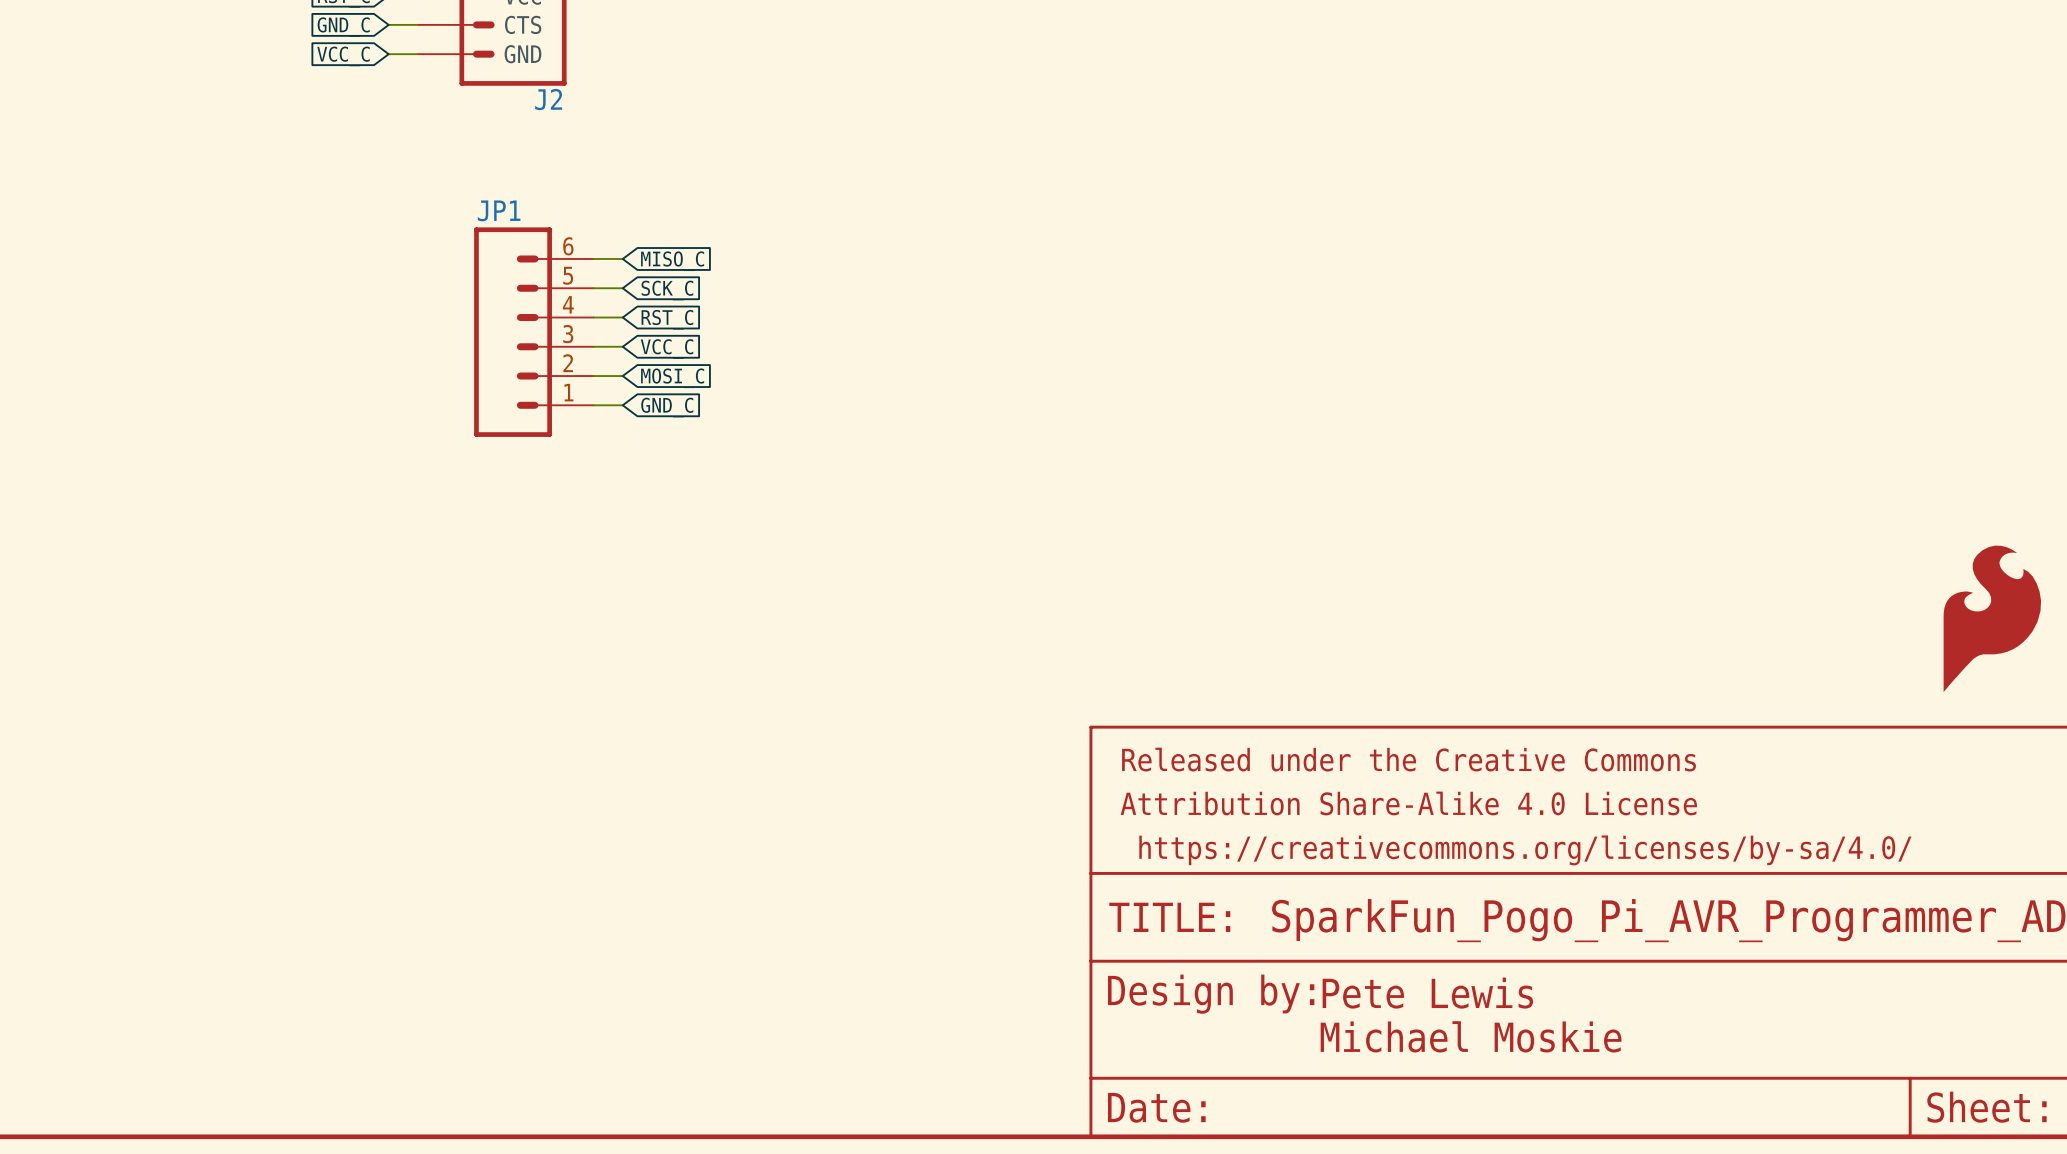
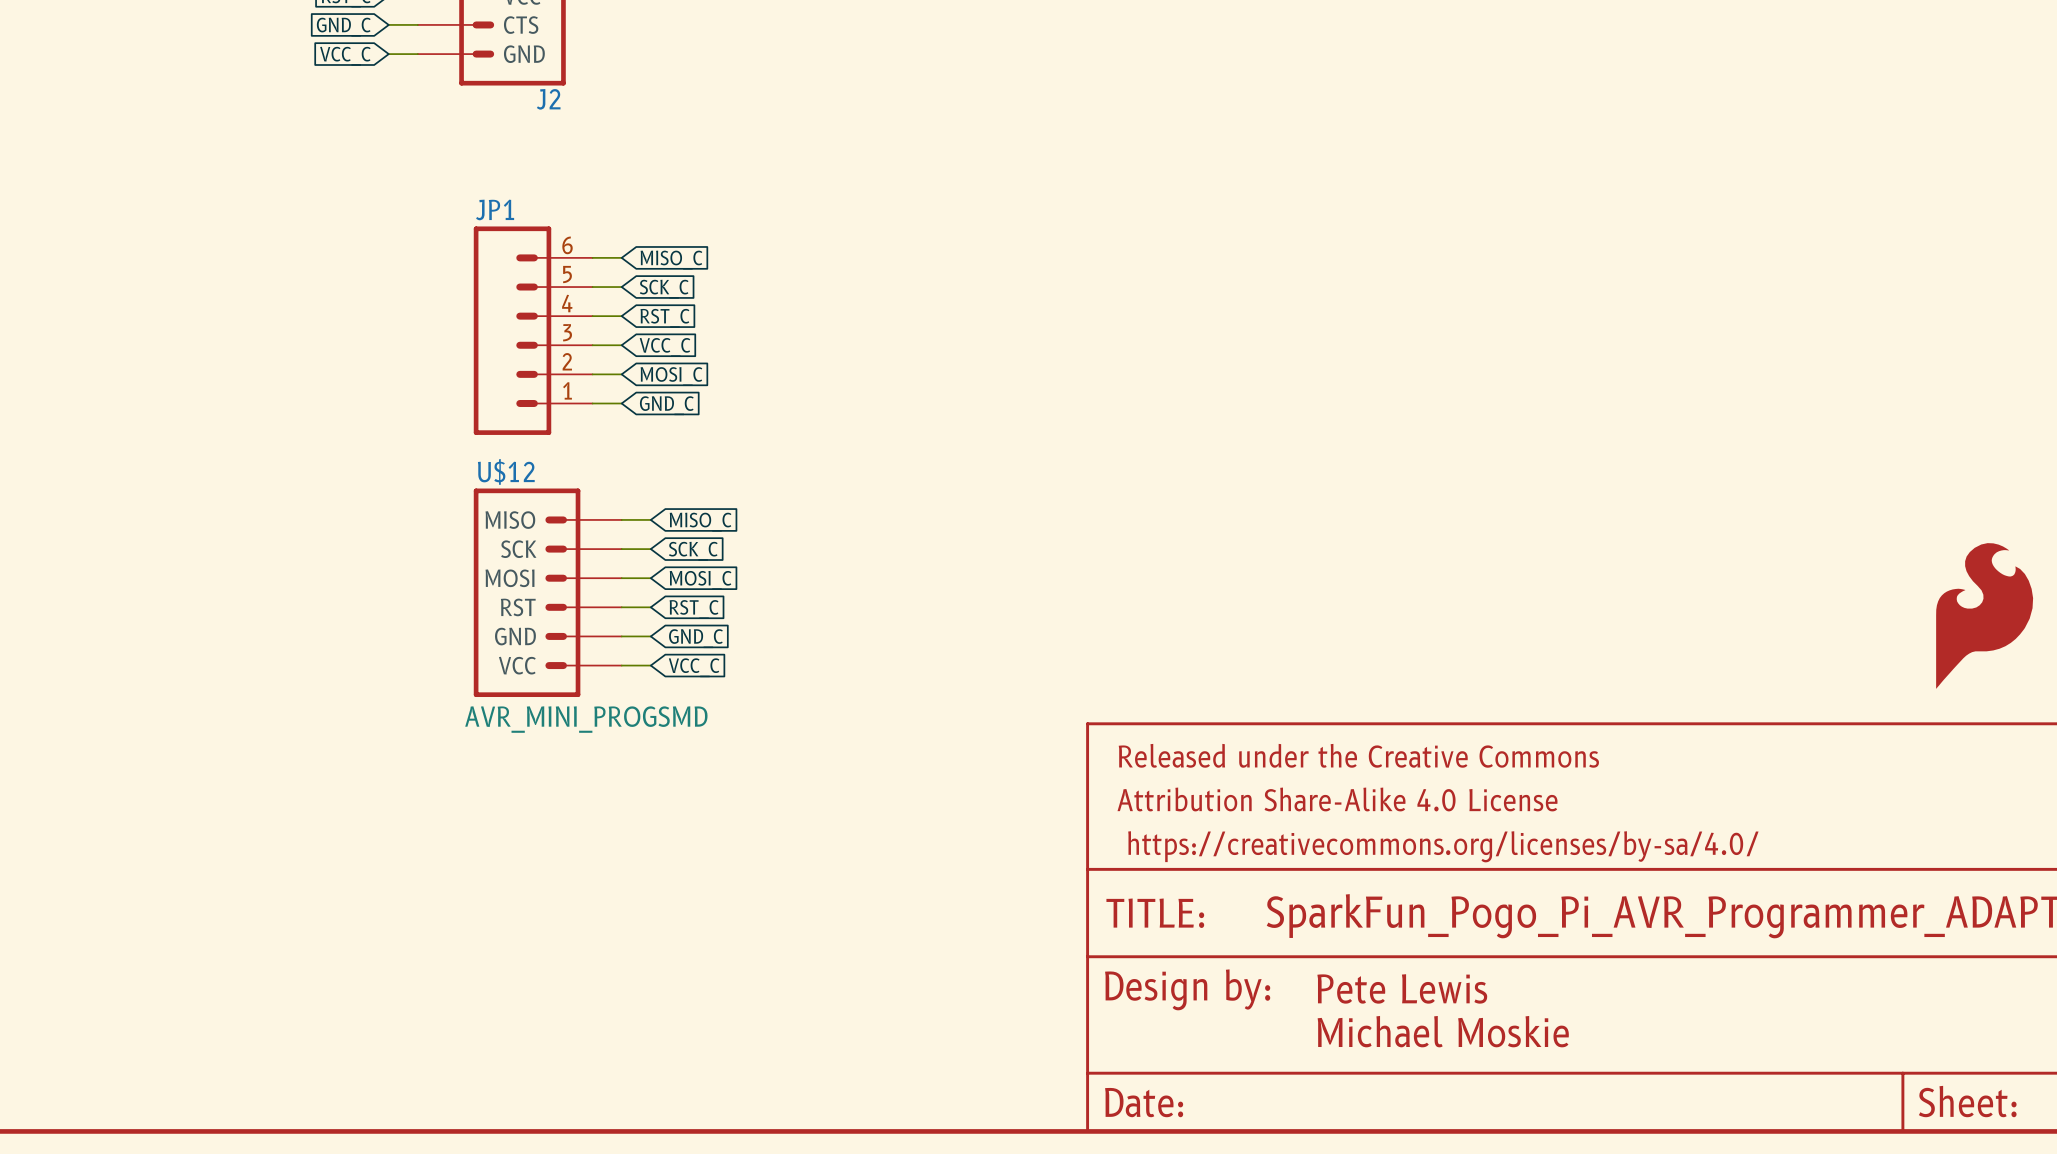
wire: none -> (621, 519) (650, 519)
global label: none -> MISO_C (700, 522)
wire: none -> (621, 549) (650, 549)
global label: none -> SCK_C (693, 551)
wire: none -> (621, 578) (650, 578)
global label: none -> MOSI_C (700, 580)
U$12: none -> AVR_MINI_PROGSMD (547, 592)
wire: none -> (621, 607) (650, 607)
global label: none -> RST_C (694, 609)
wire: none -> (621, 636) (650, 636)
global label: none -> GND_C (695, 638)
wire: none -> (621, 665) (650, 665)
global label: none -> VCC_C (694, 667)

